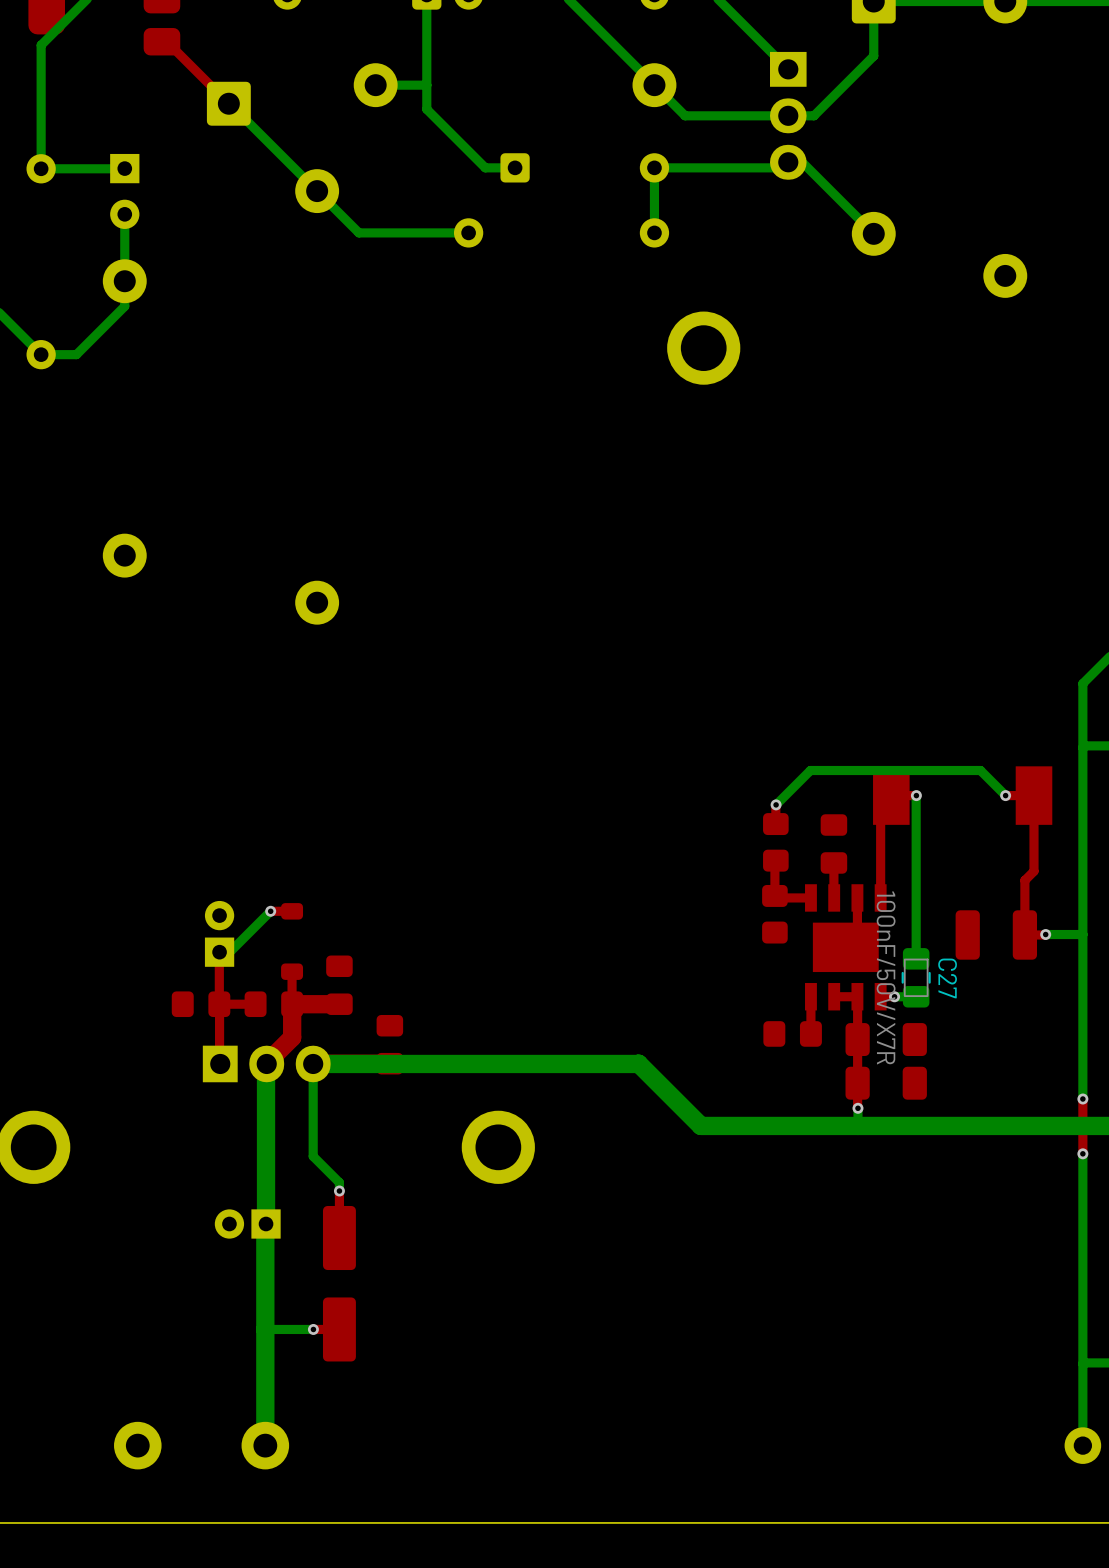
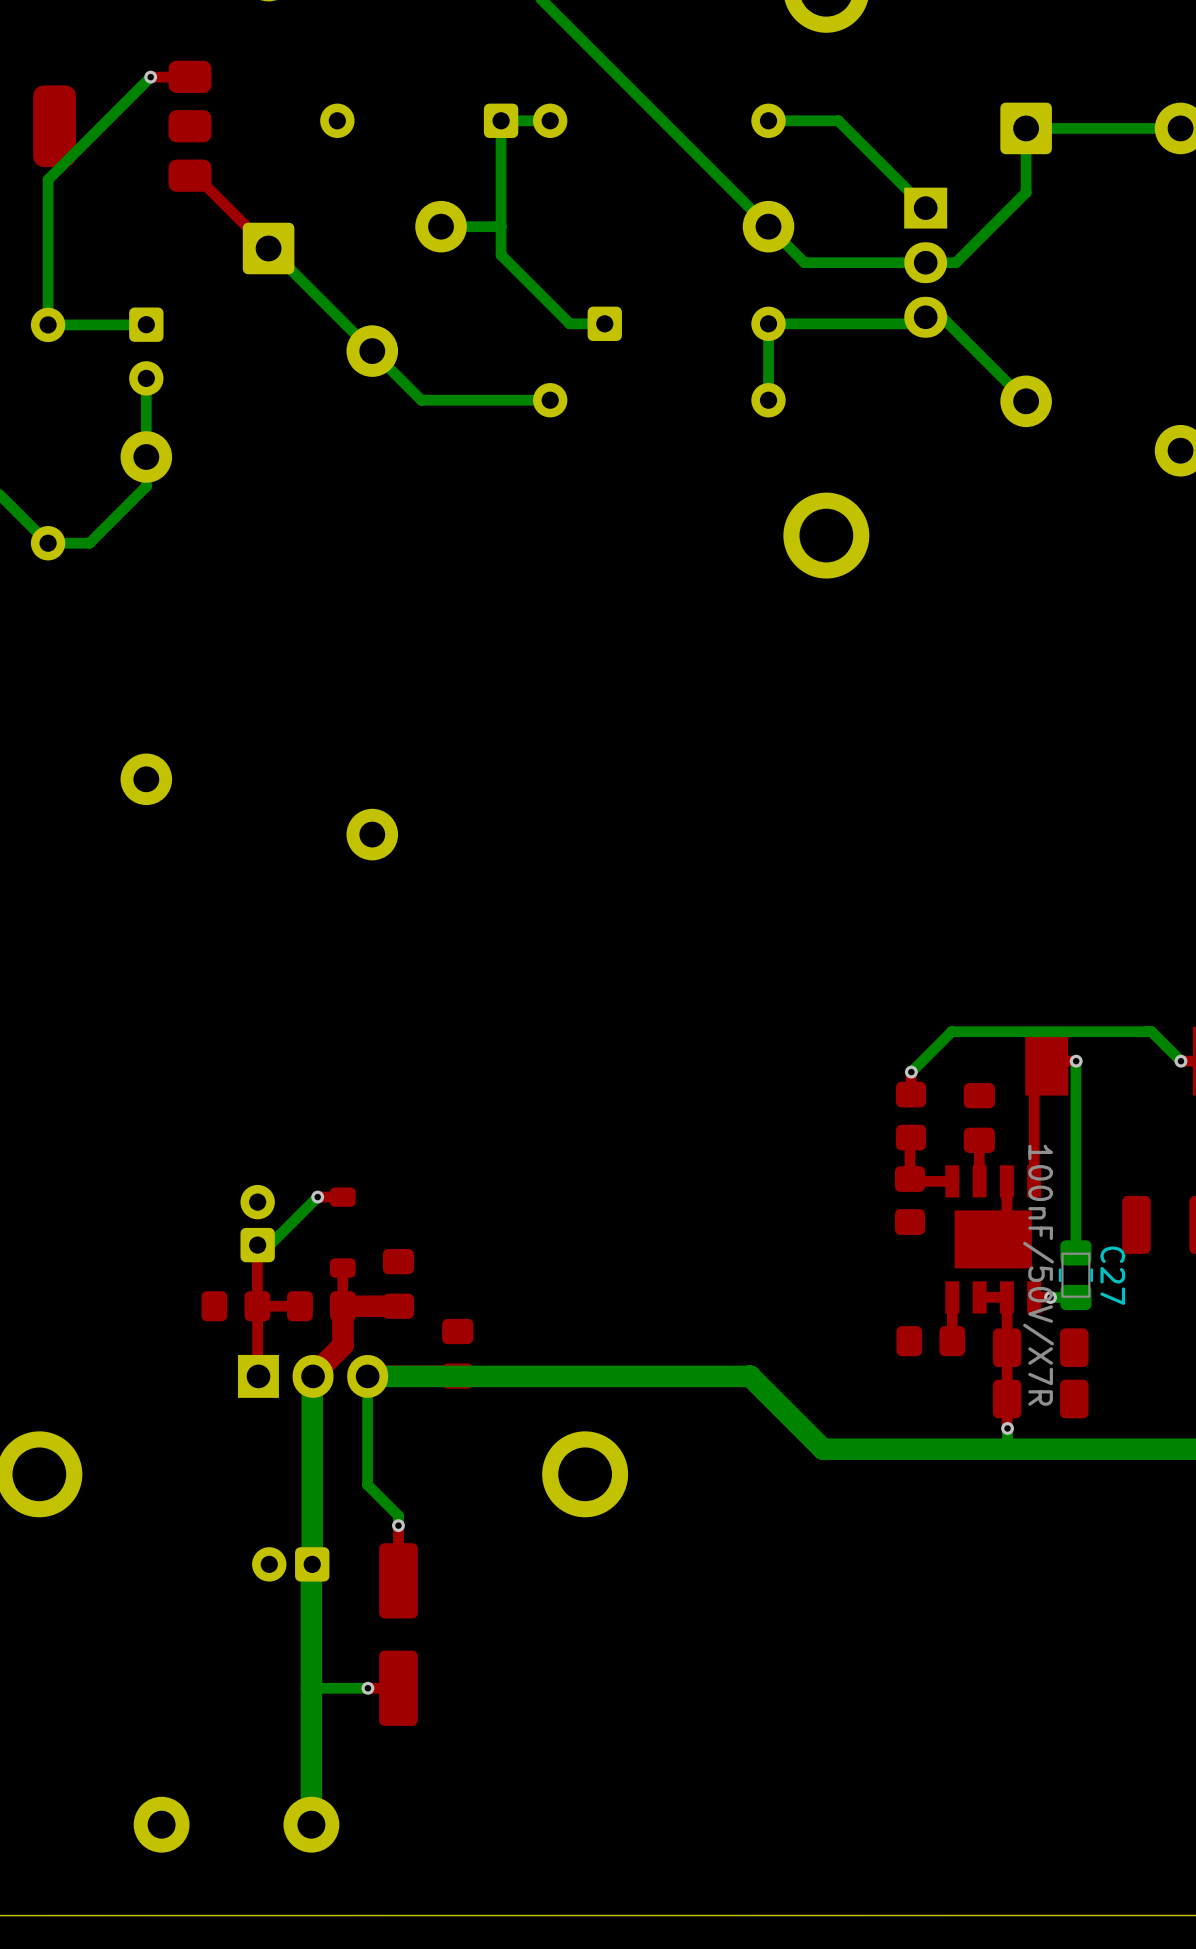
part footprint: [110, 153, 140, 229] -> [129, 307, 164, 396]
part footprint: [204, 900, 235, 967] -> [240, 1184, 275, 1263]
part footprint: [214, 1209, 281, 1239] -> [252, 1547, 330, 1582]

